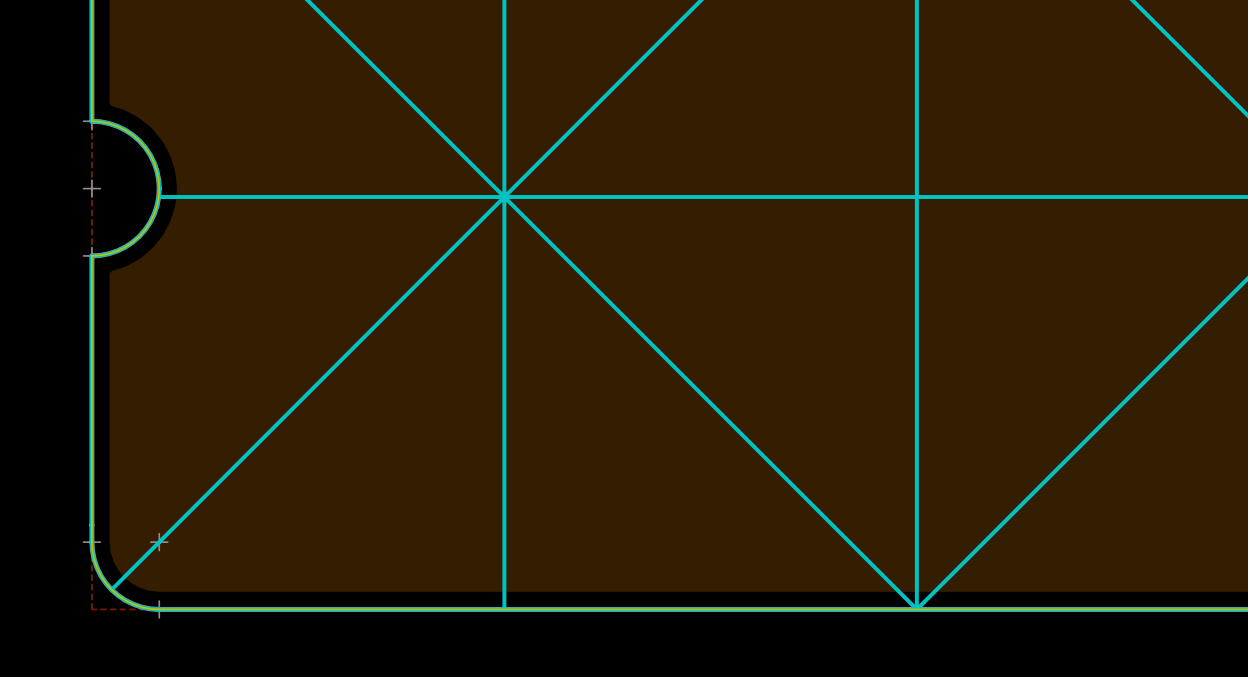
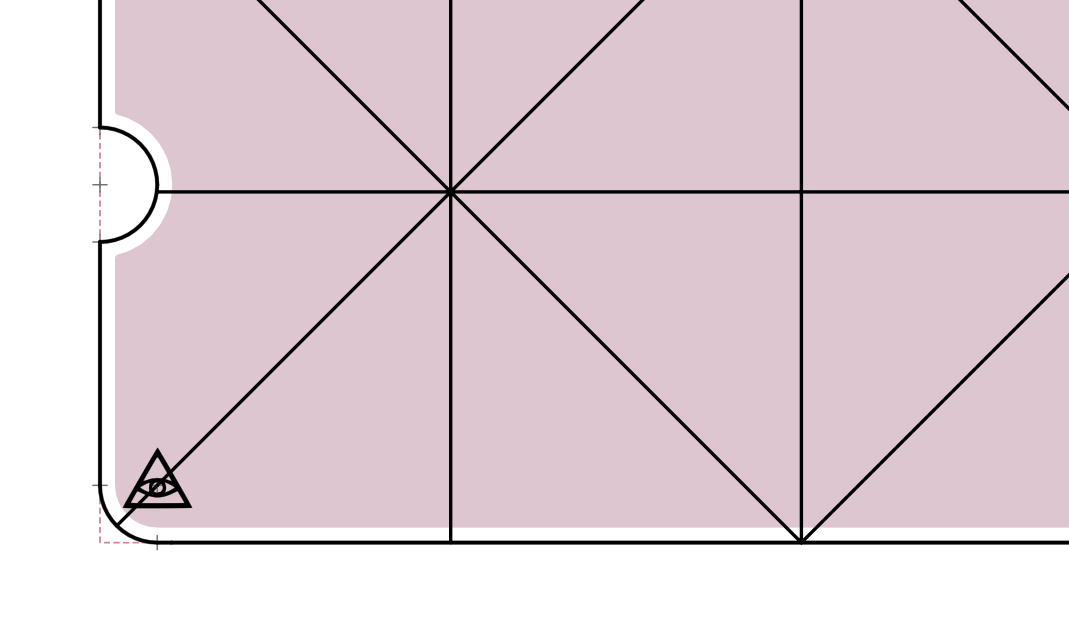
drawing: none -> [122, 447, 193, 509]

